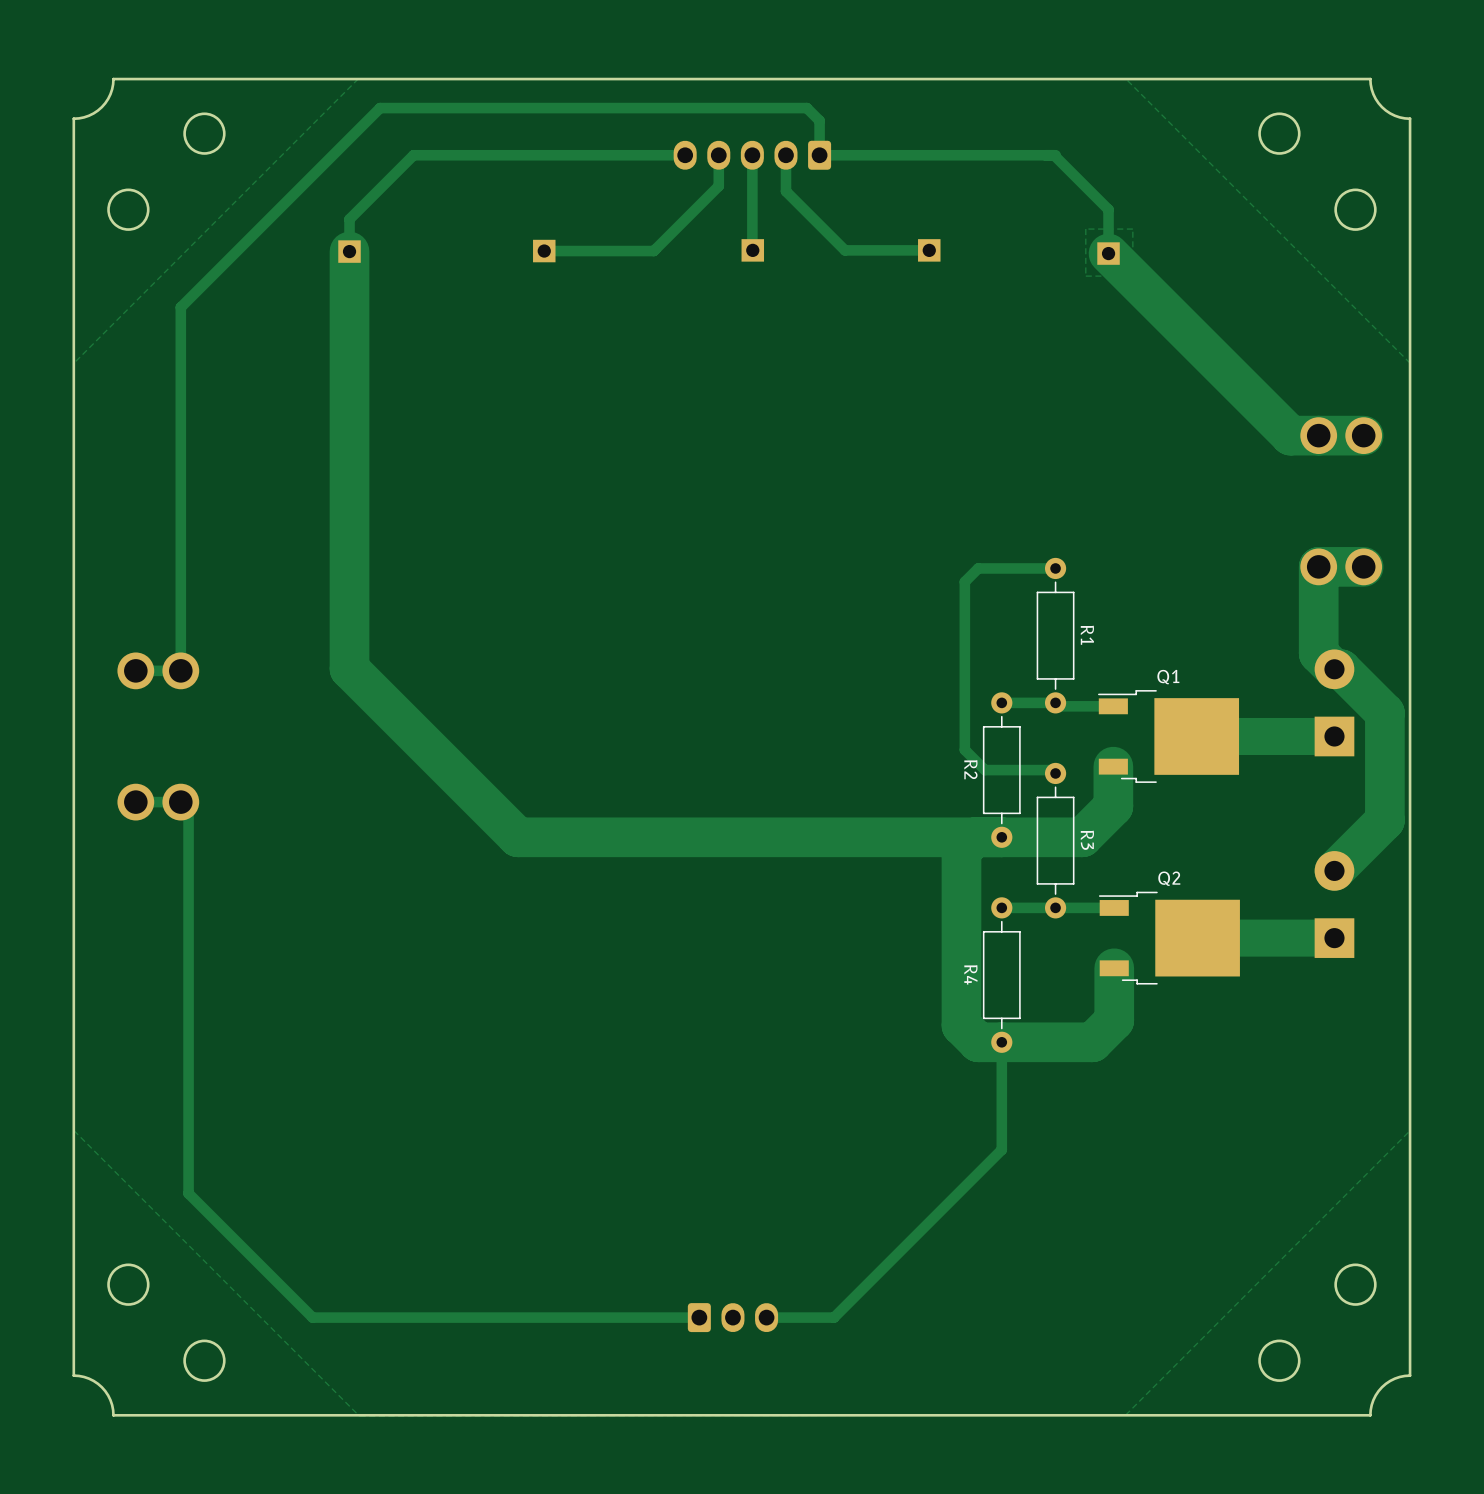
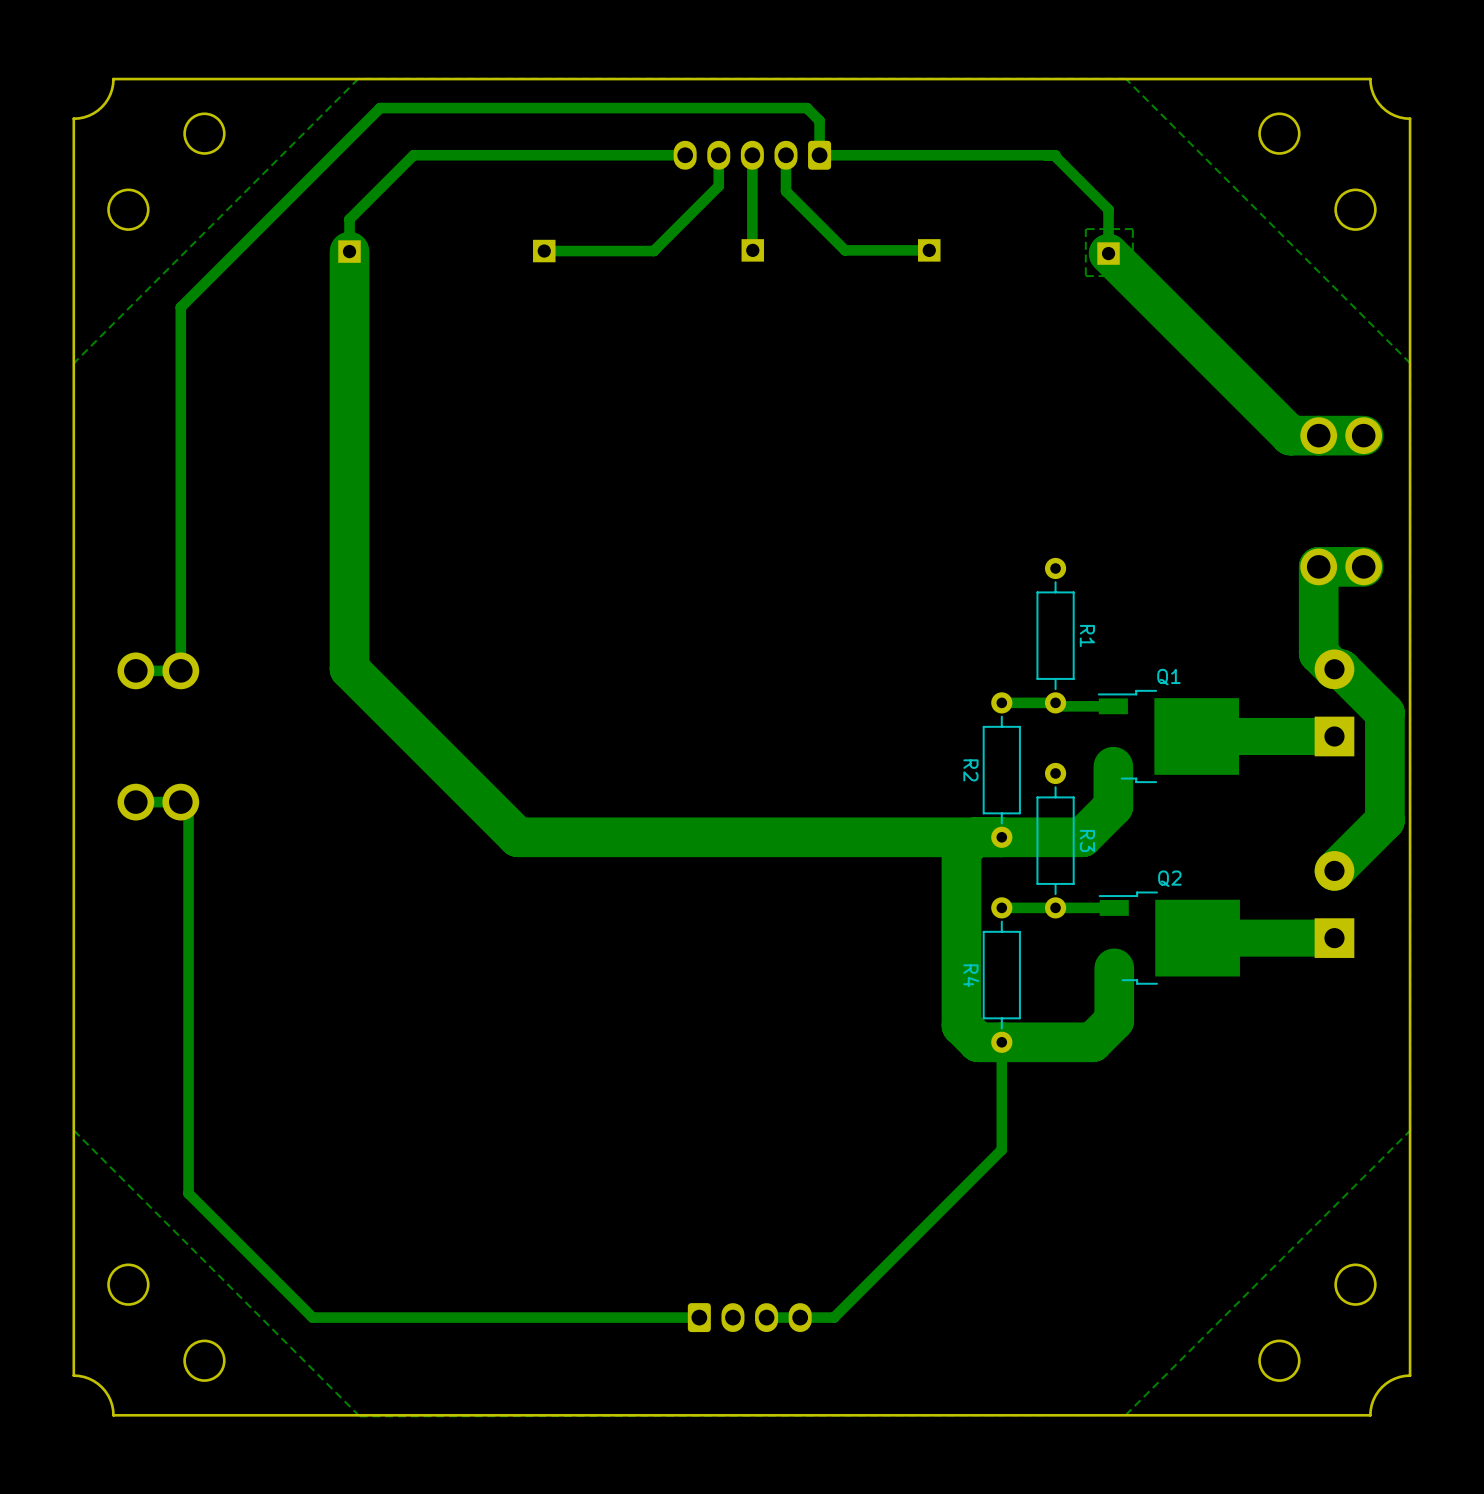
track: (1055, 568) (978, 568) (964, 581) (964, 749) (984, 770) (1055, 770) -> none
part: none -> (749, 1317)

